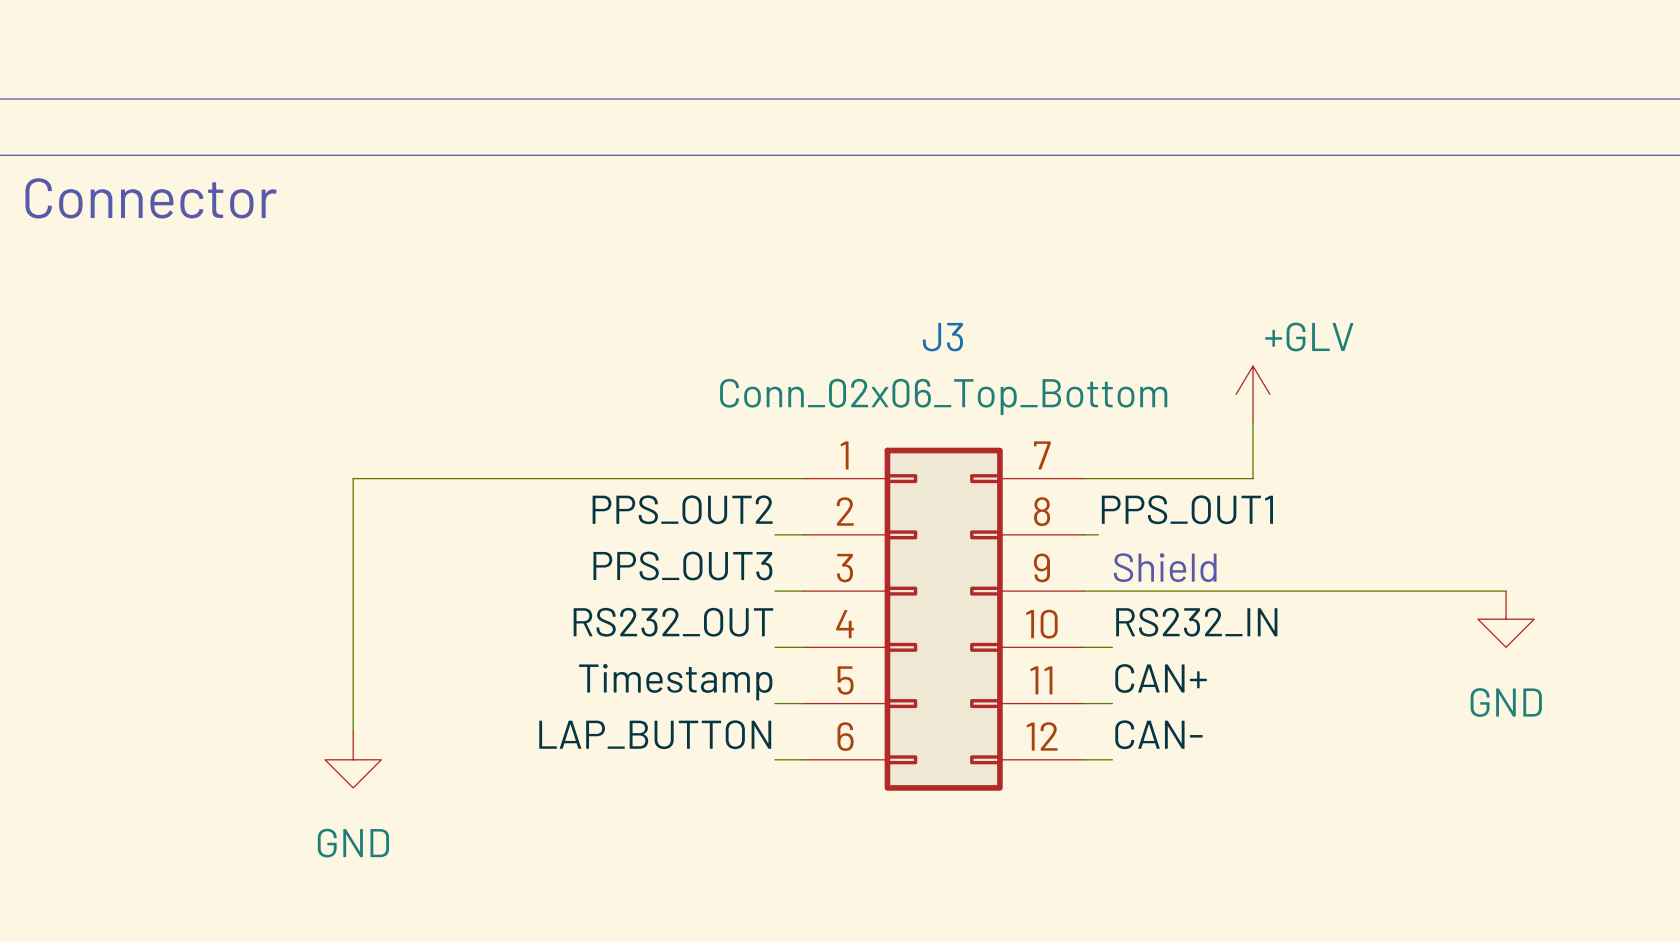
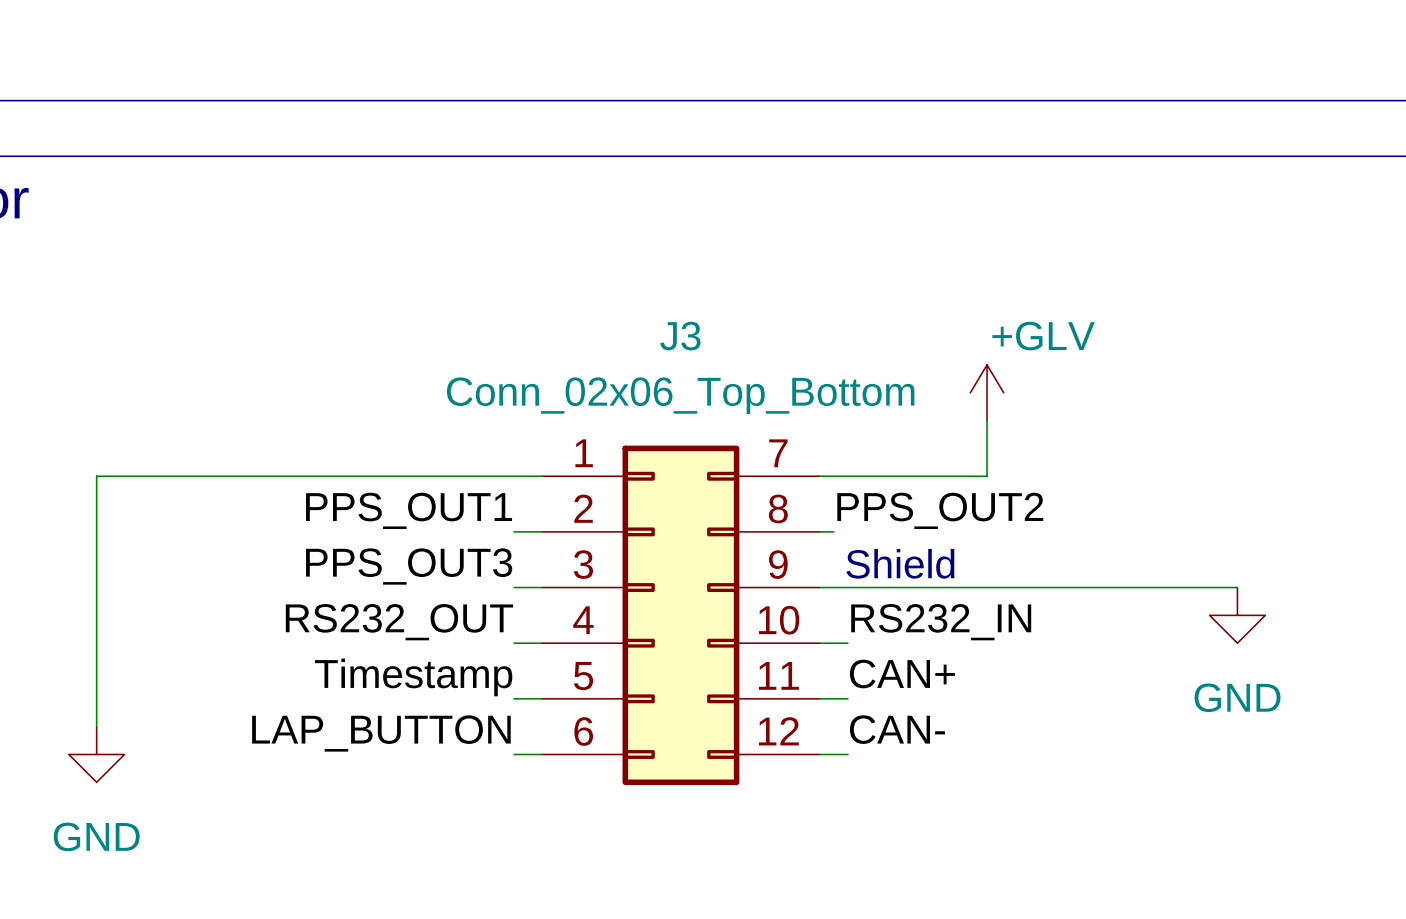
label: PPS_OUT2 (682, 509) -> PPS_OUT1 (409, 510)
label: PPS_OUT1 (1187, 509) -> PPS_OUT2 (940, 510)

